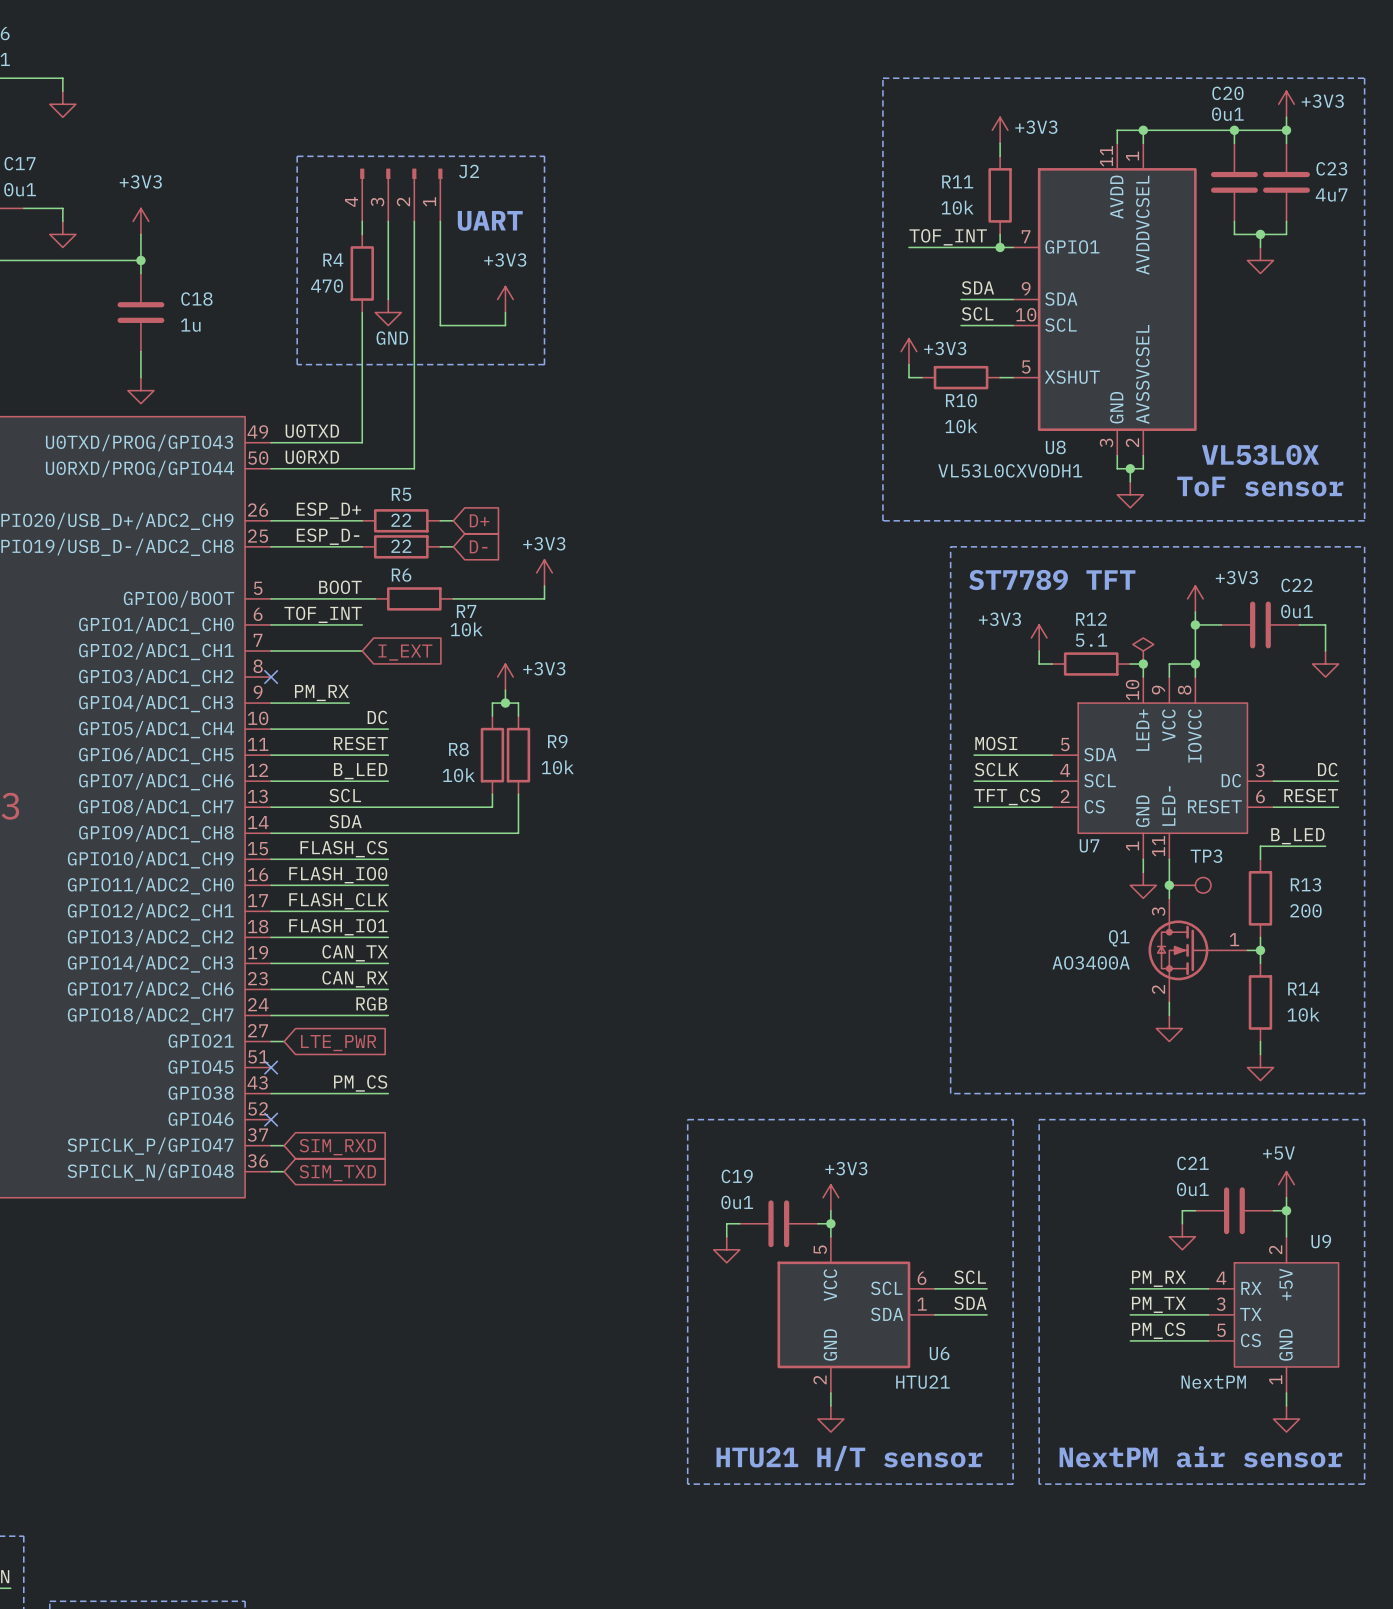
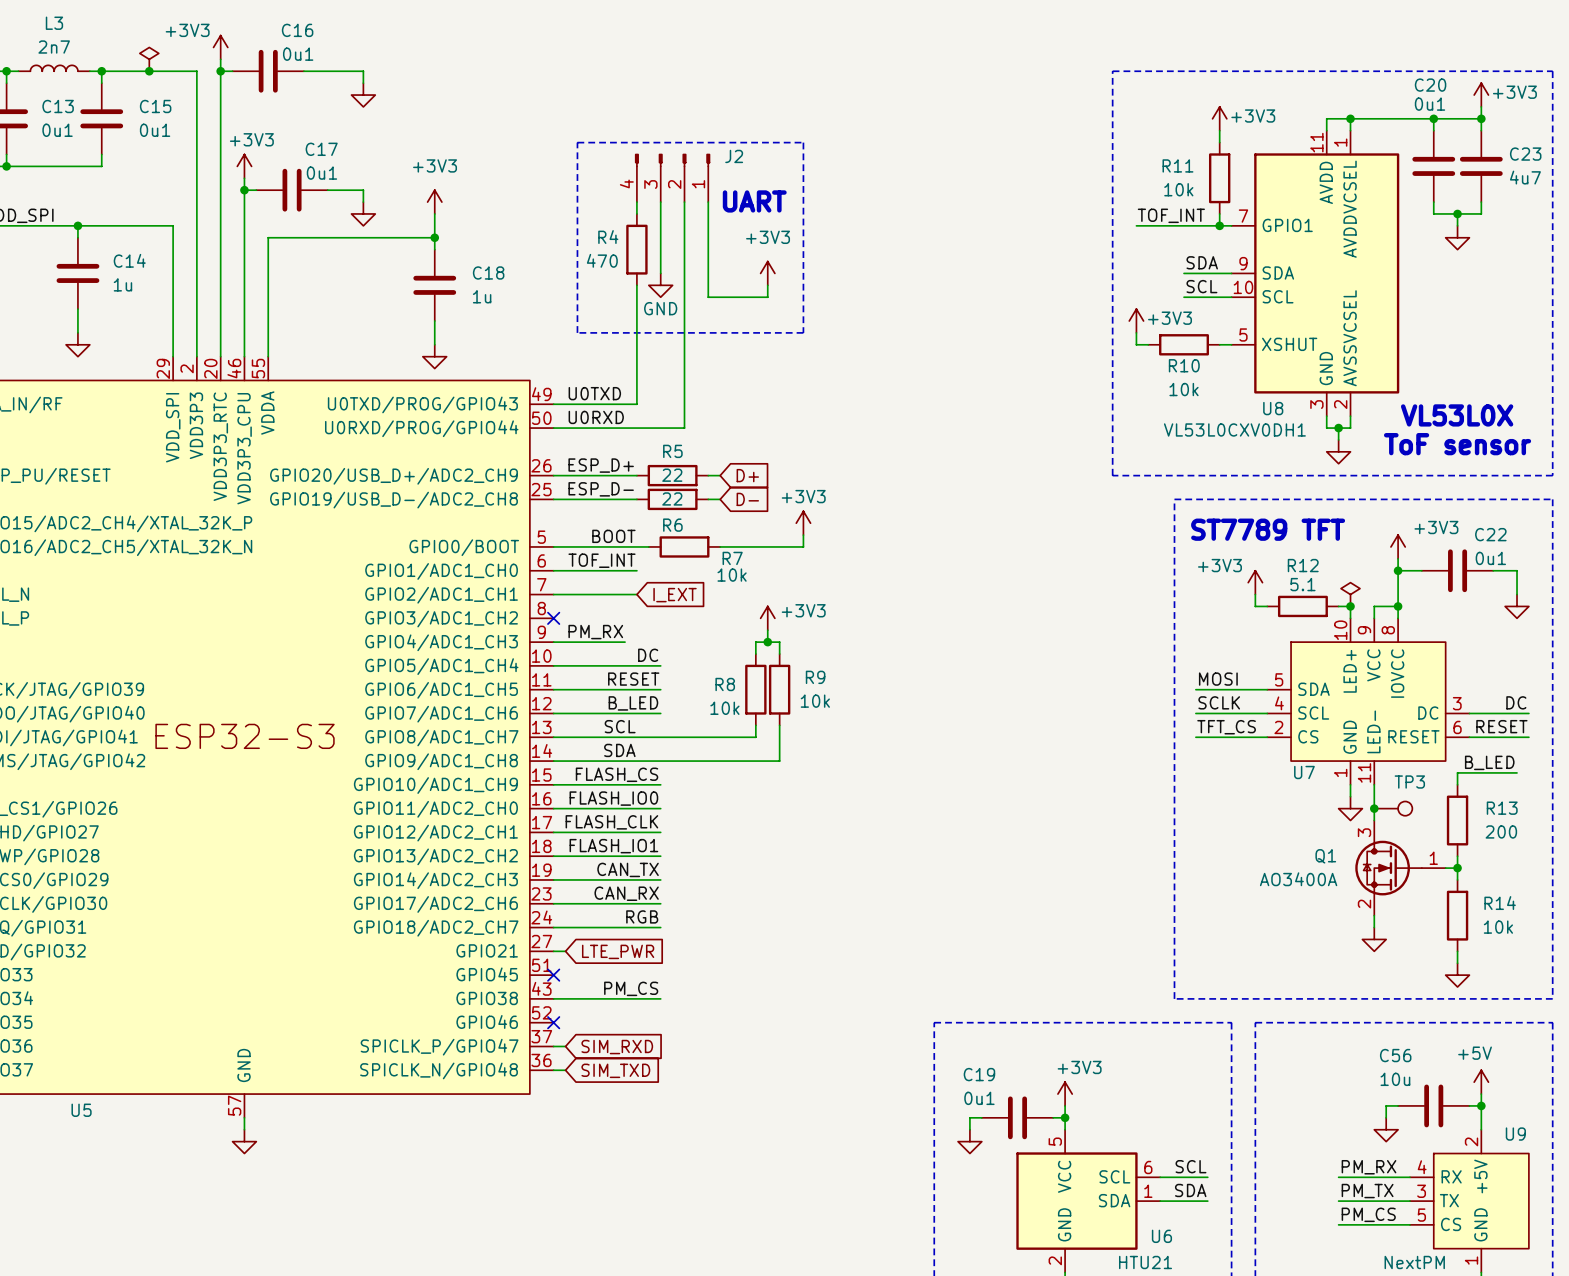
C21 name: C21 (1192, 1163) -> C56 (1395, 1055)
C21 value: 0u1 (1192, 1189) -> 10u (1395, 1079)

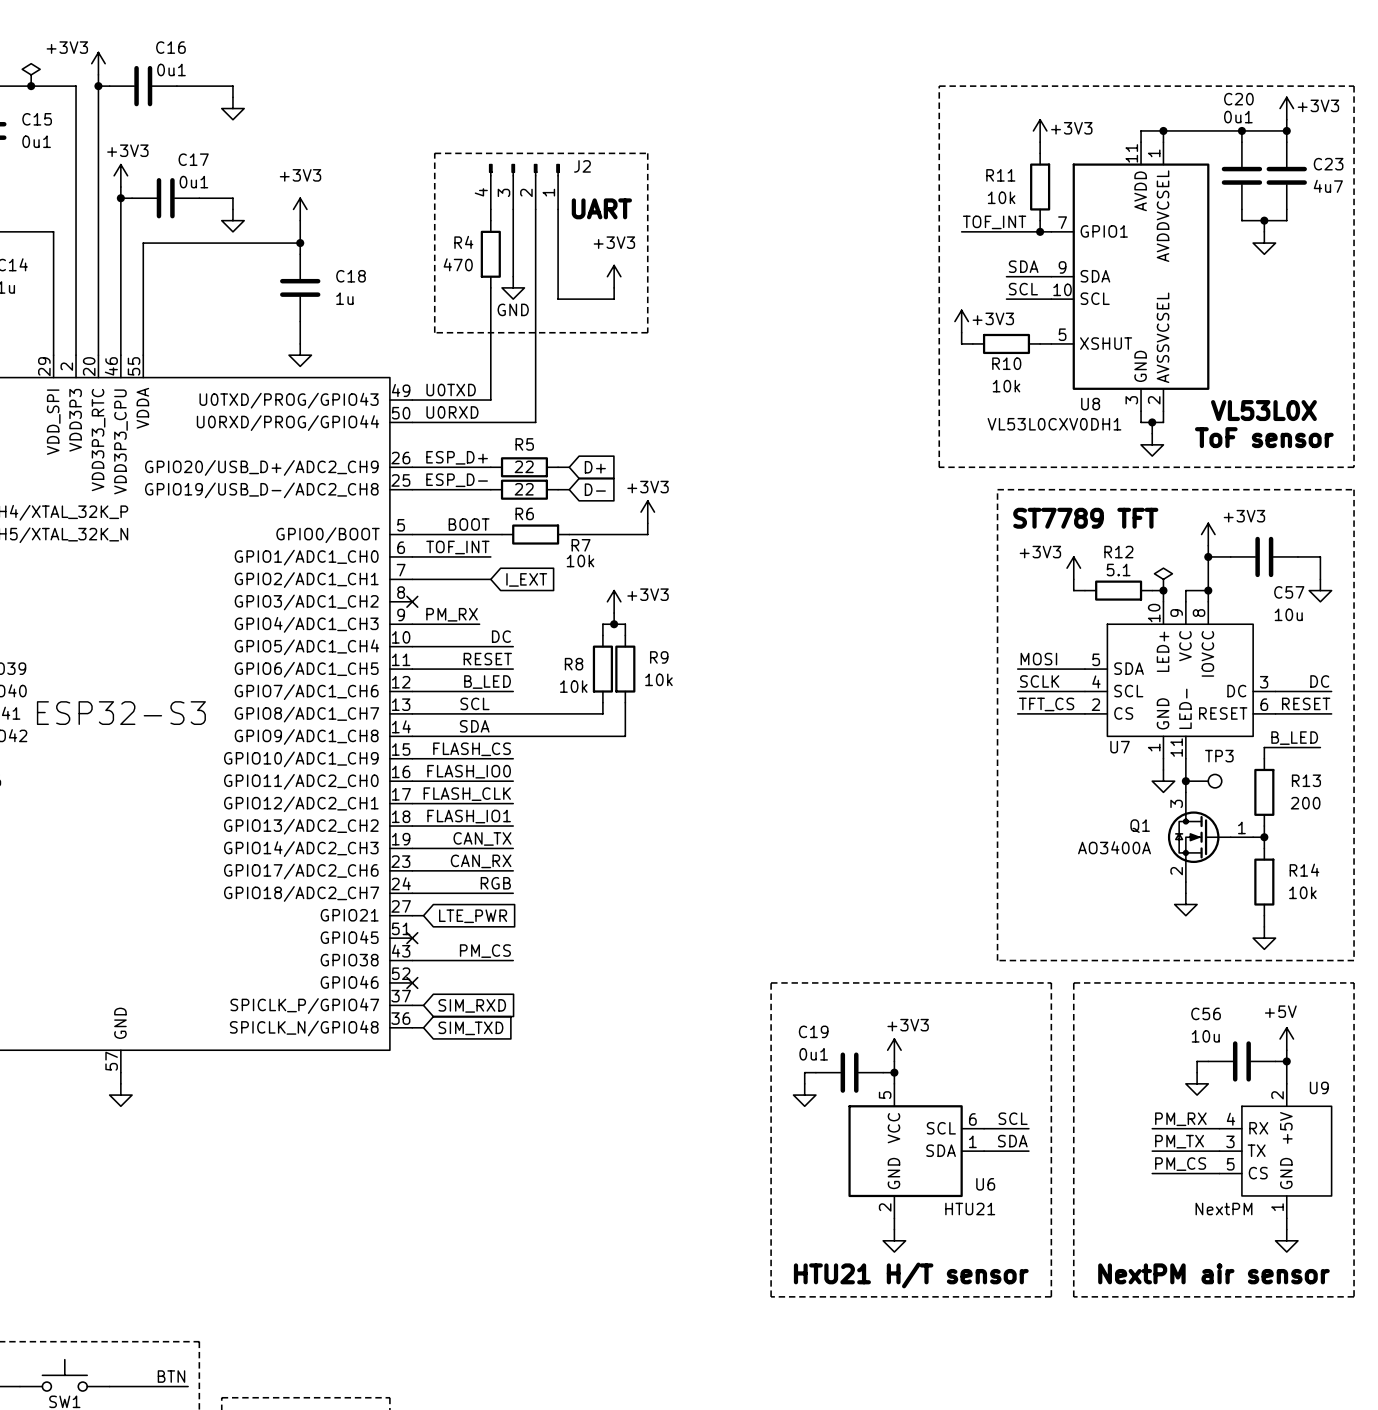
C22 name: C22 (1490, 534) -> C57 (1289, 592)
C22 value: 0u1 (1490, 558) -> 10u (1288, 614)

